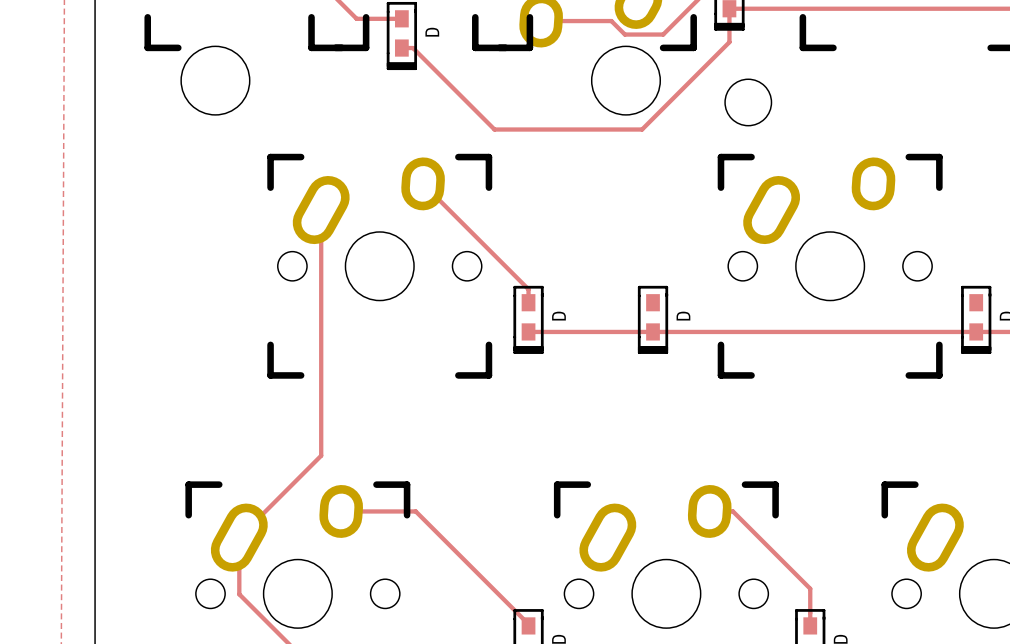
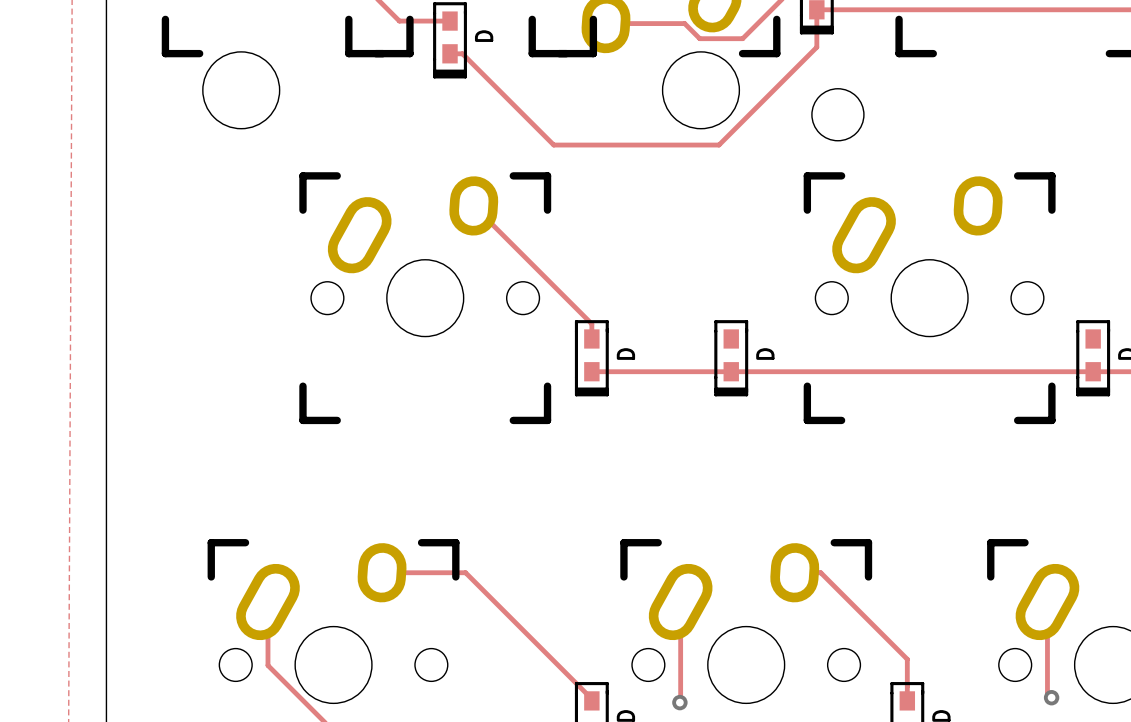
track: (321, 210) (321, 455) (239, 537) -> none
track: none -> (680, 602) (679, 702)
track: none -> (1047, 602) (1047, 693) (1051, 697)
via: none -> (1051, 697)
via: none -> (679, 702)

